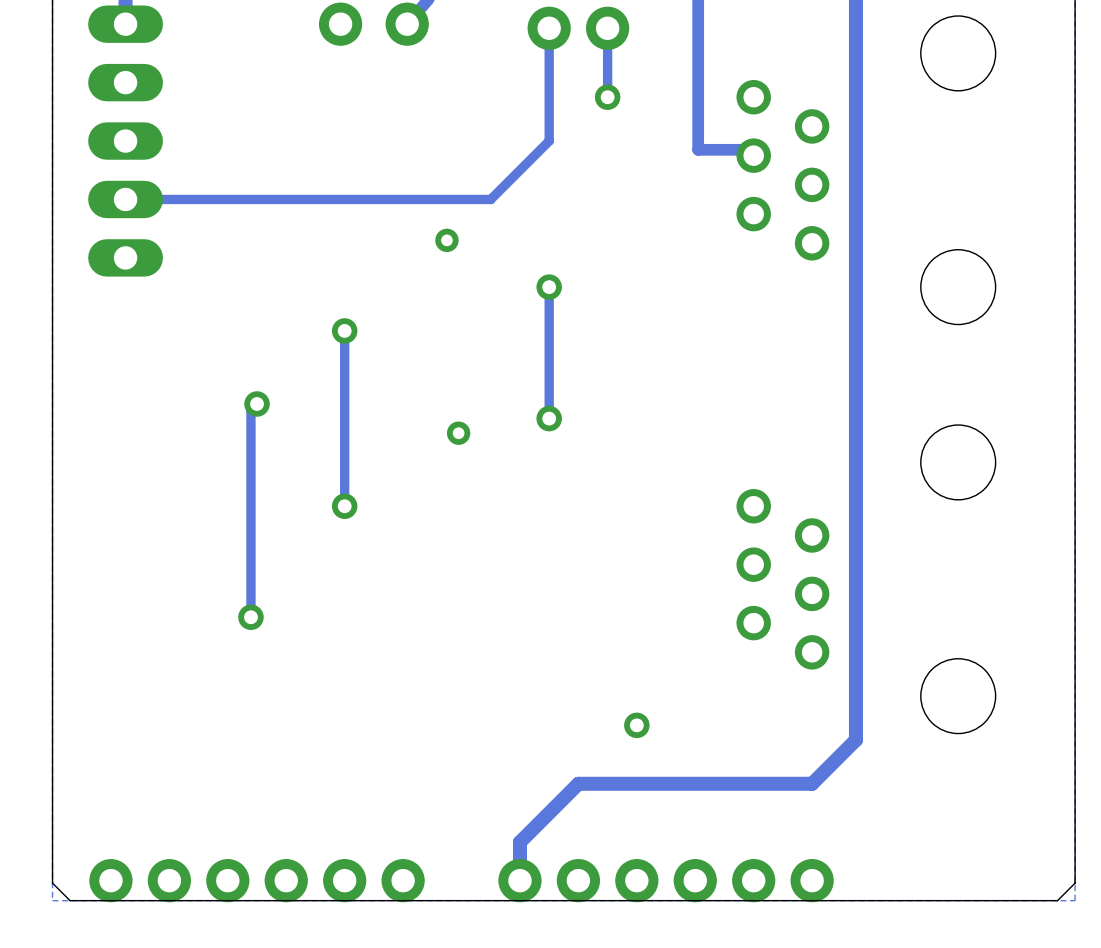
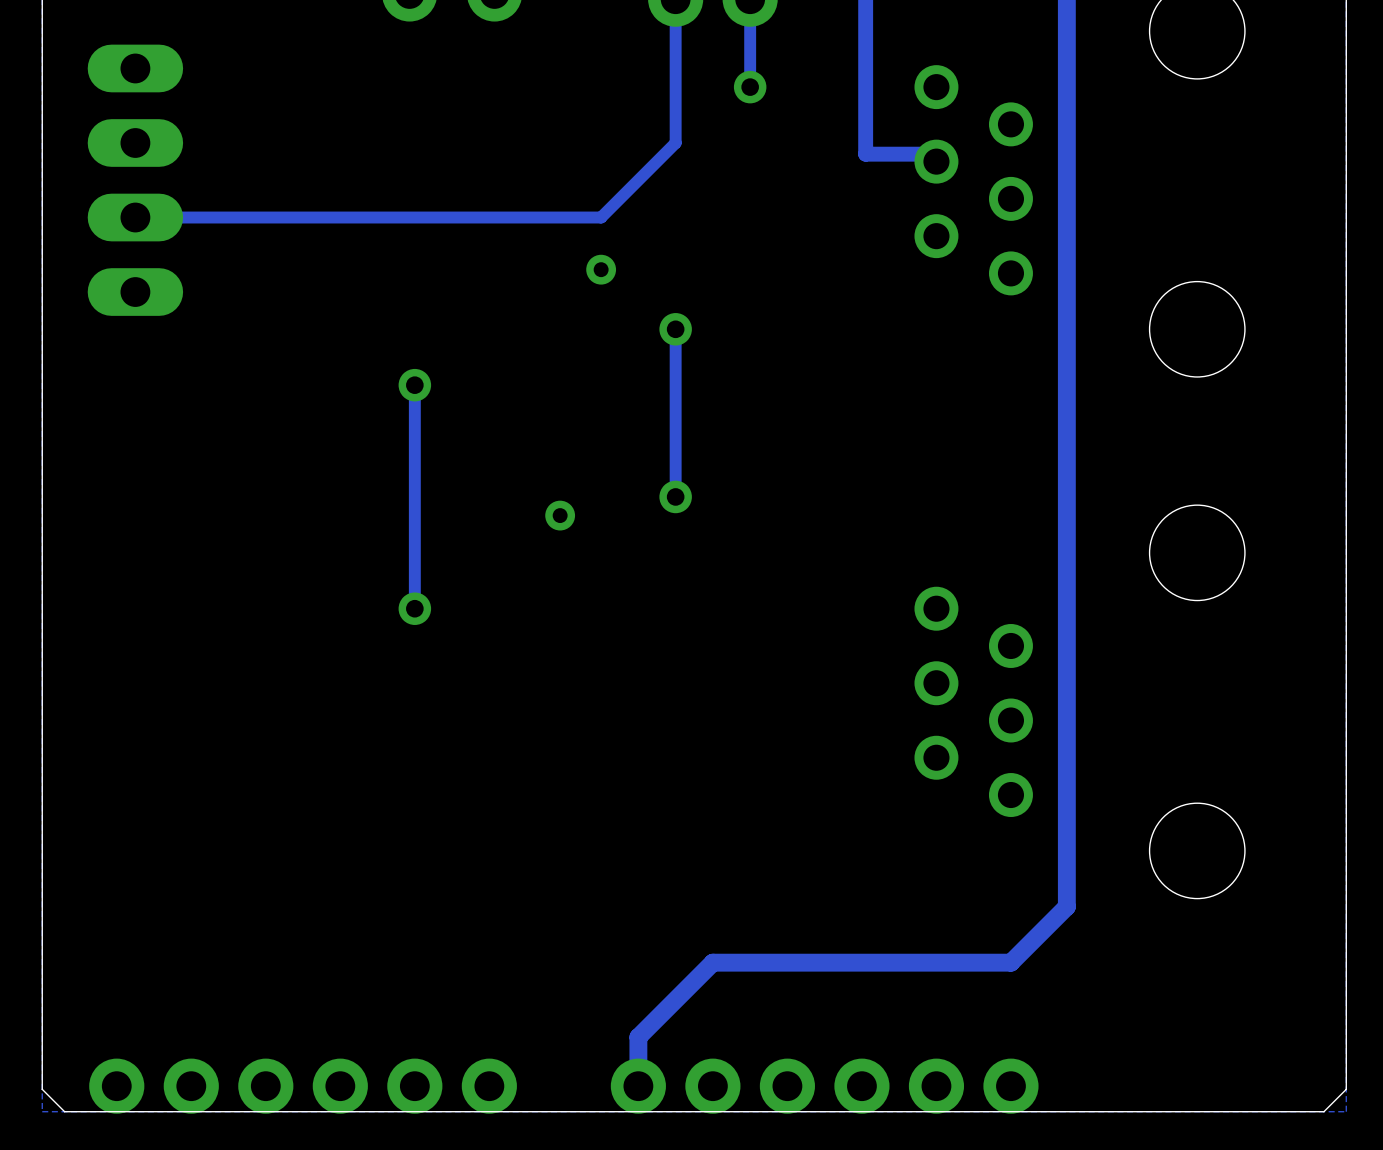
via position: (446, 240) -> (601, 269)
track: (257, 403) (250, 410) (250, 617) -> none
via: (257, 403) -> none
via: (250, 617) -> none
via: (636, 725) -> none

